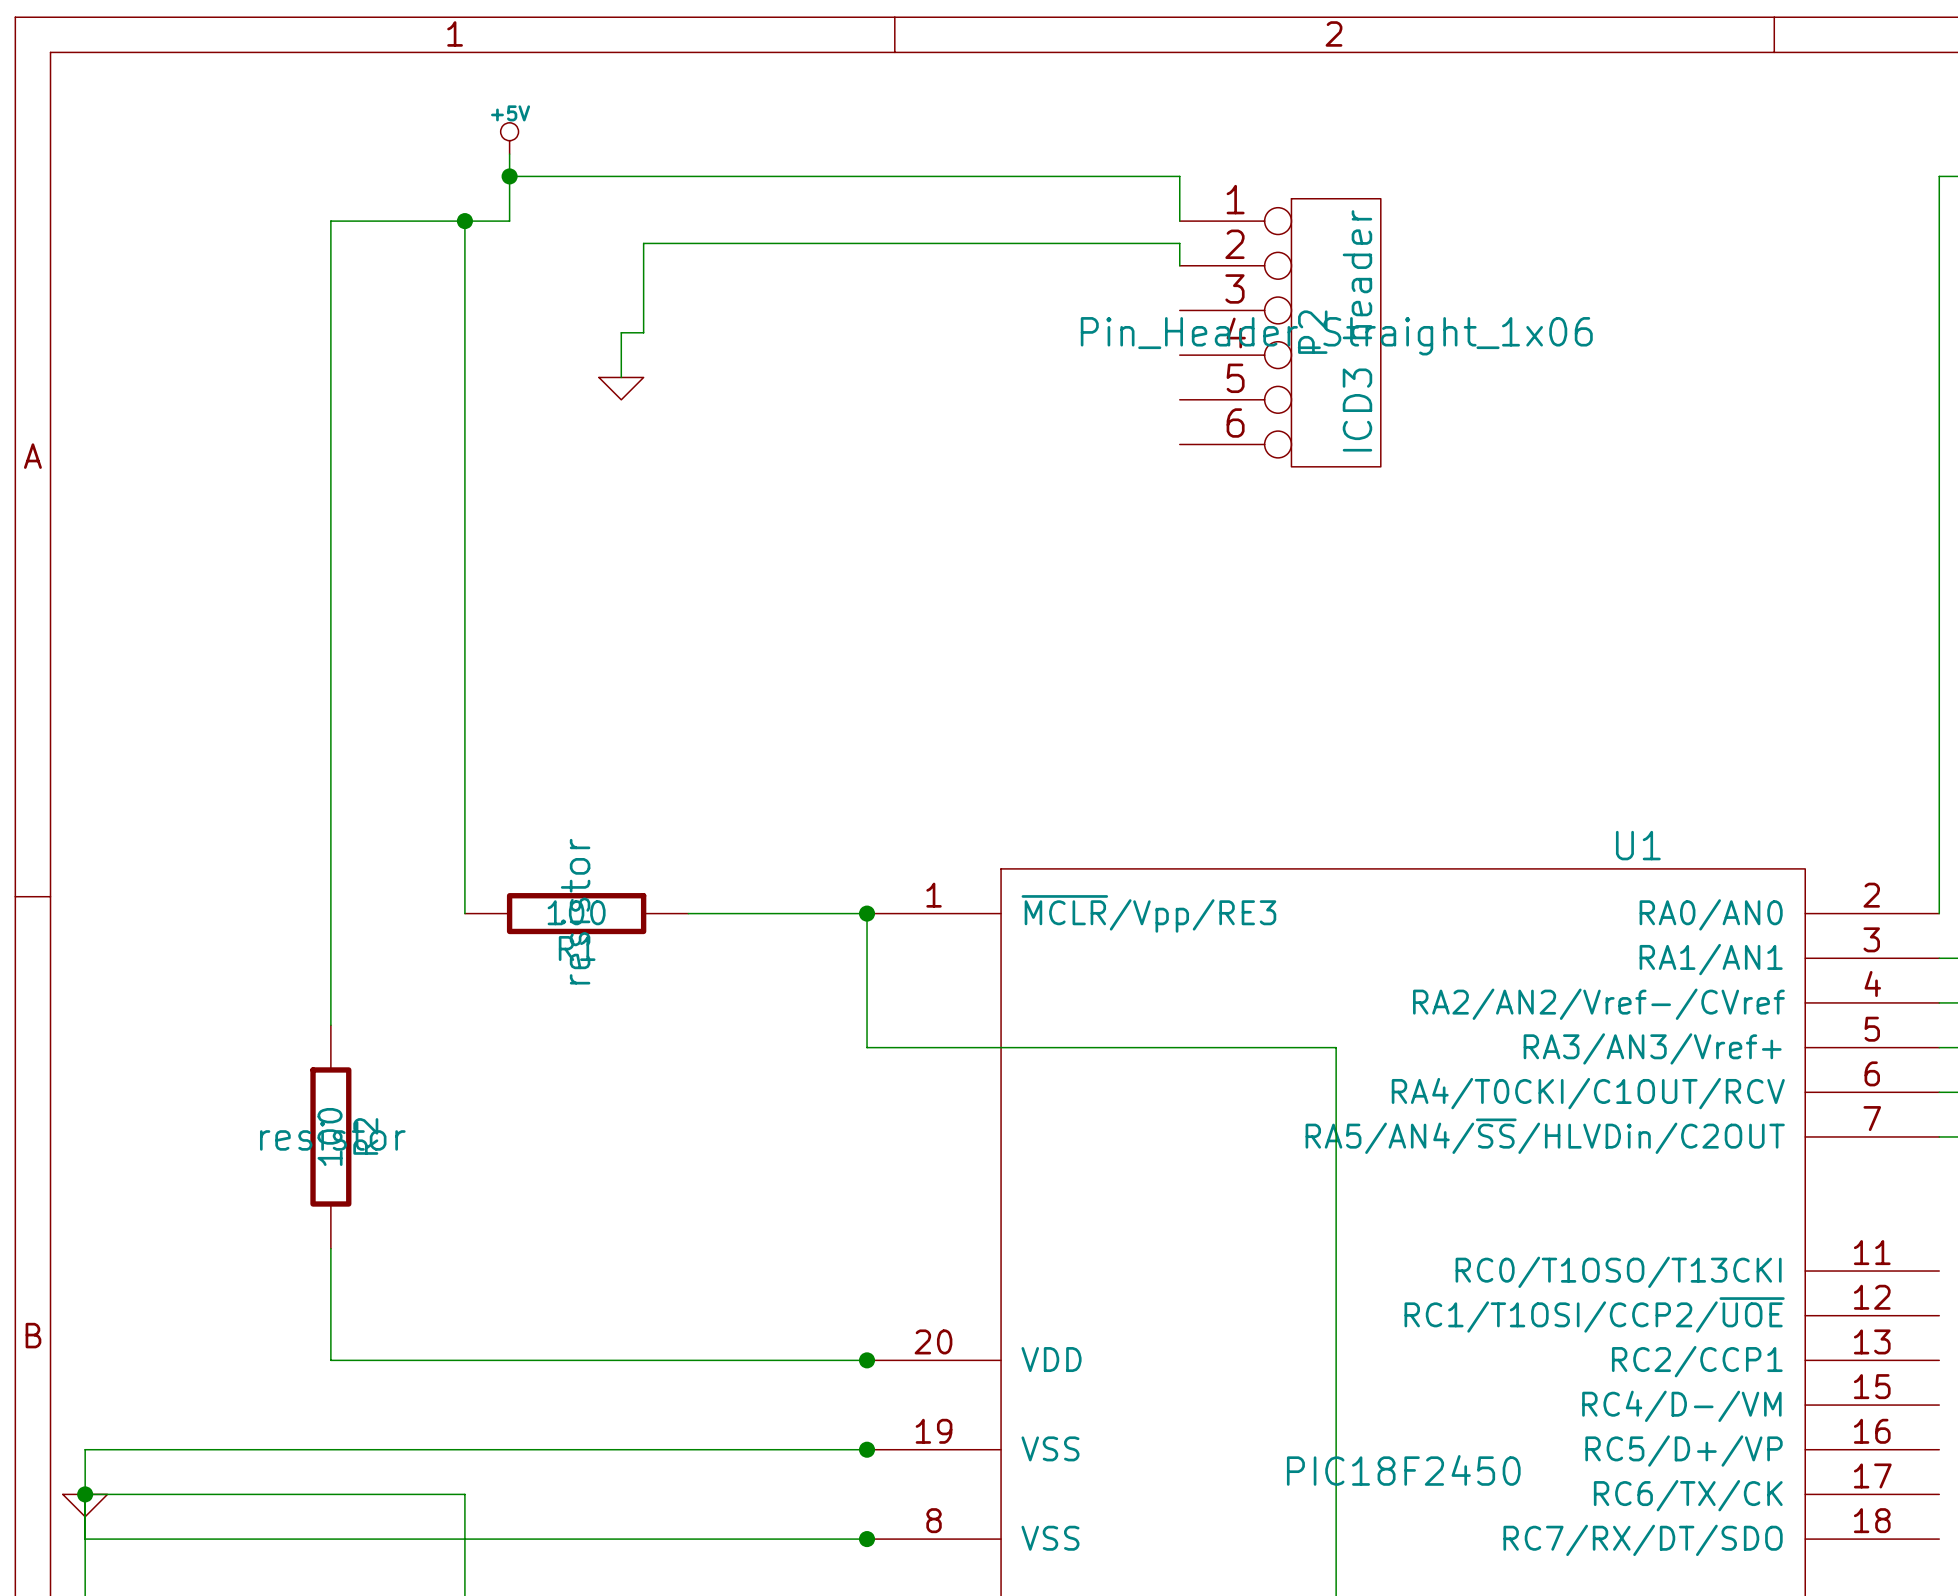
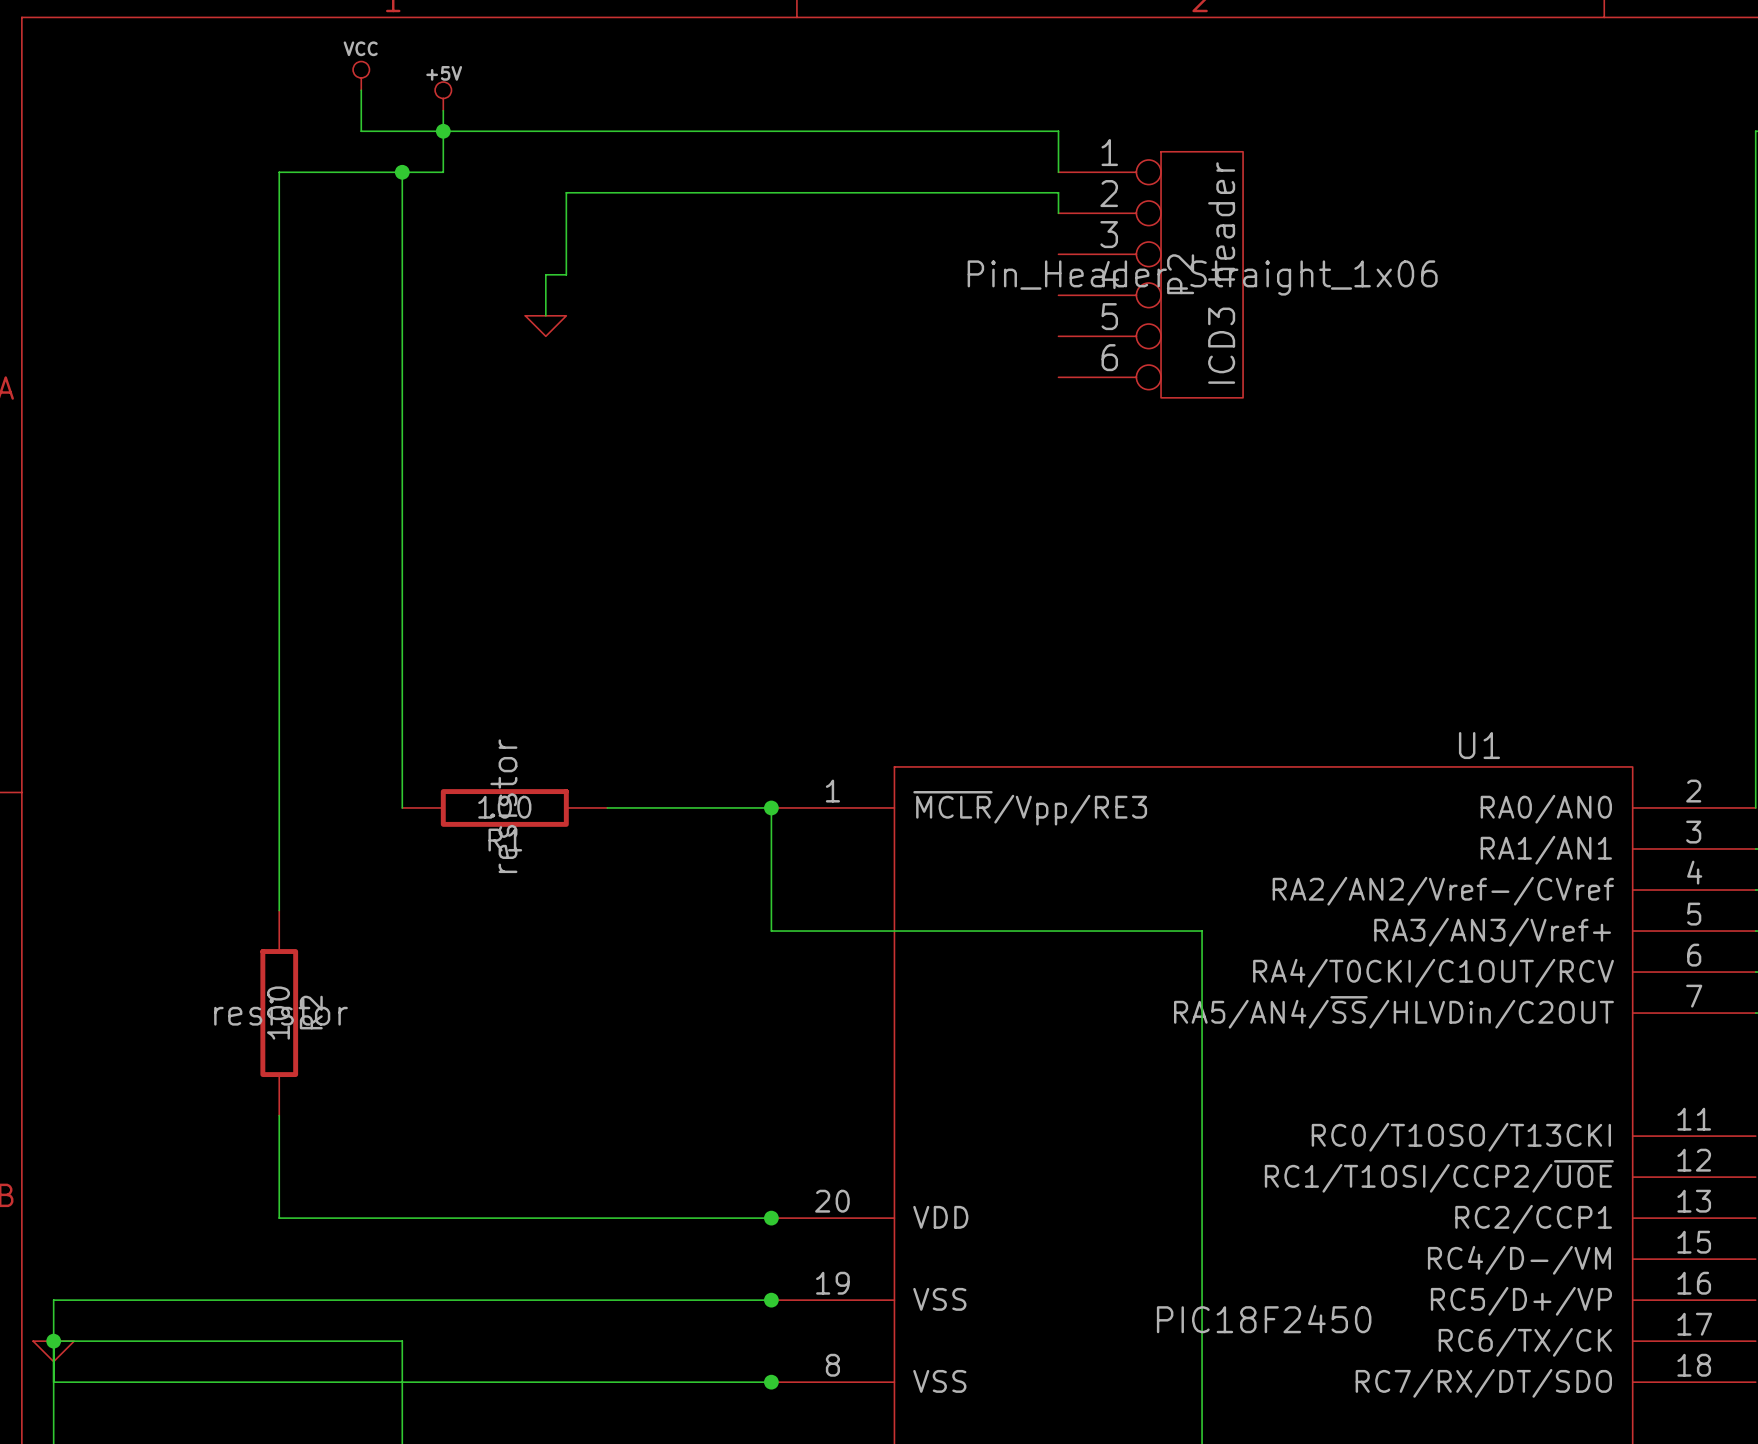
power symbol: none -> VCC (361, 75)
wire: none -> (361, 90) (361, 131) (443, 131)

